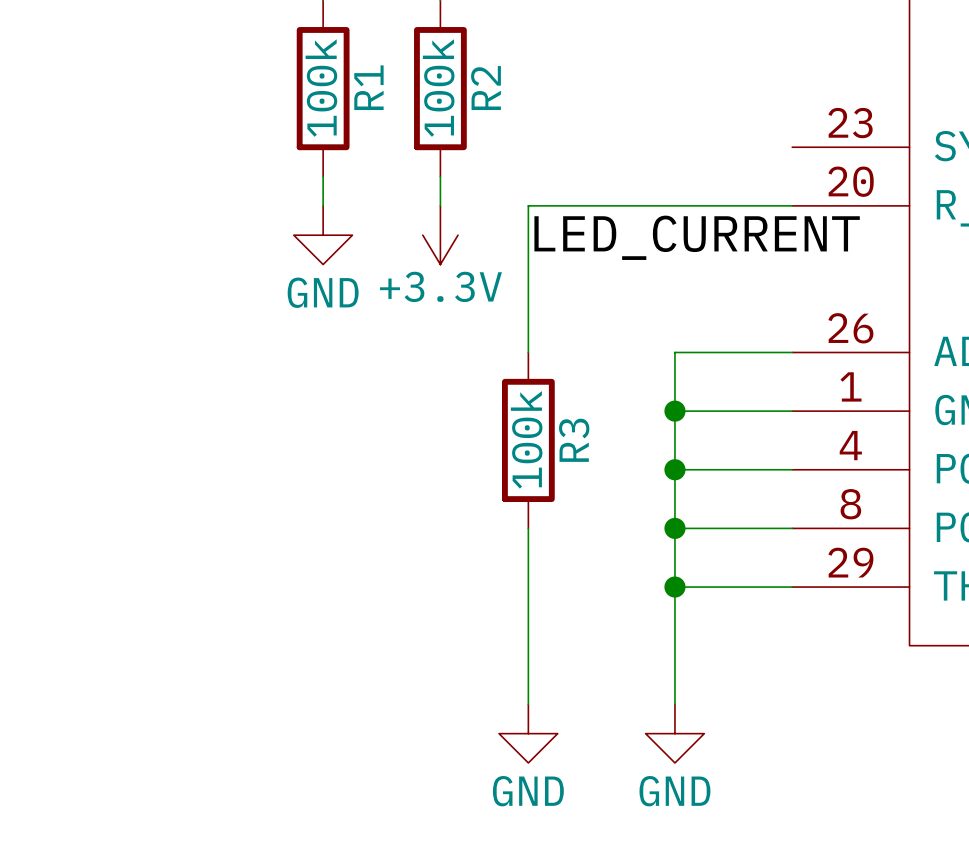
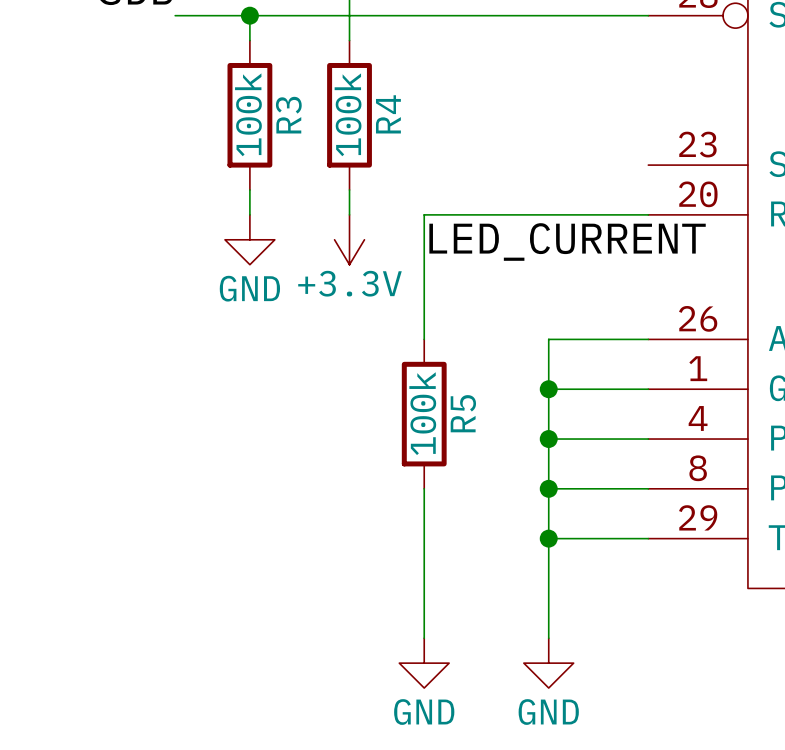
R1 name: R1 (368, 87) -> R3 (288, 115)
R2 name: R2 (485, 88) -> R4 (388, 114)
R3 name: R3 (574, 440) -> R5 (463, 413)

